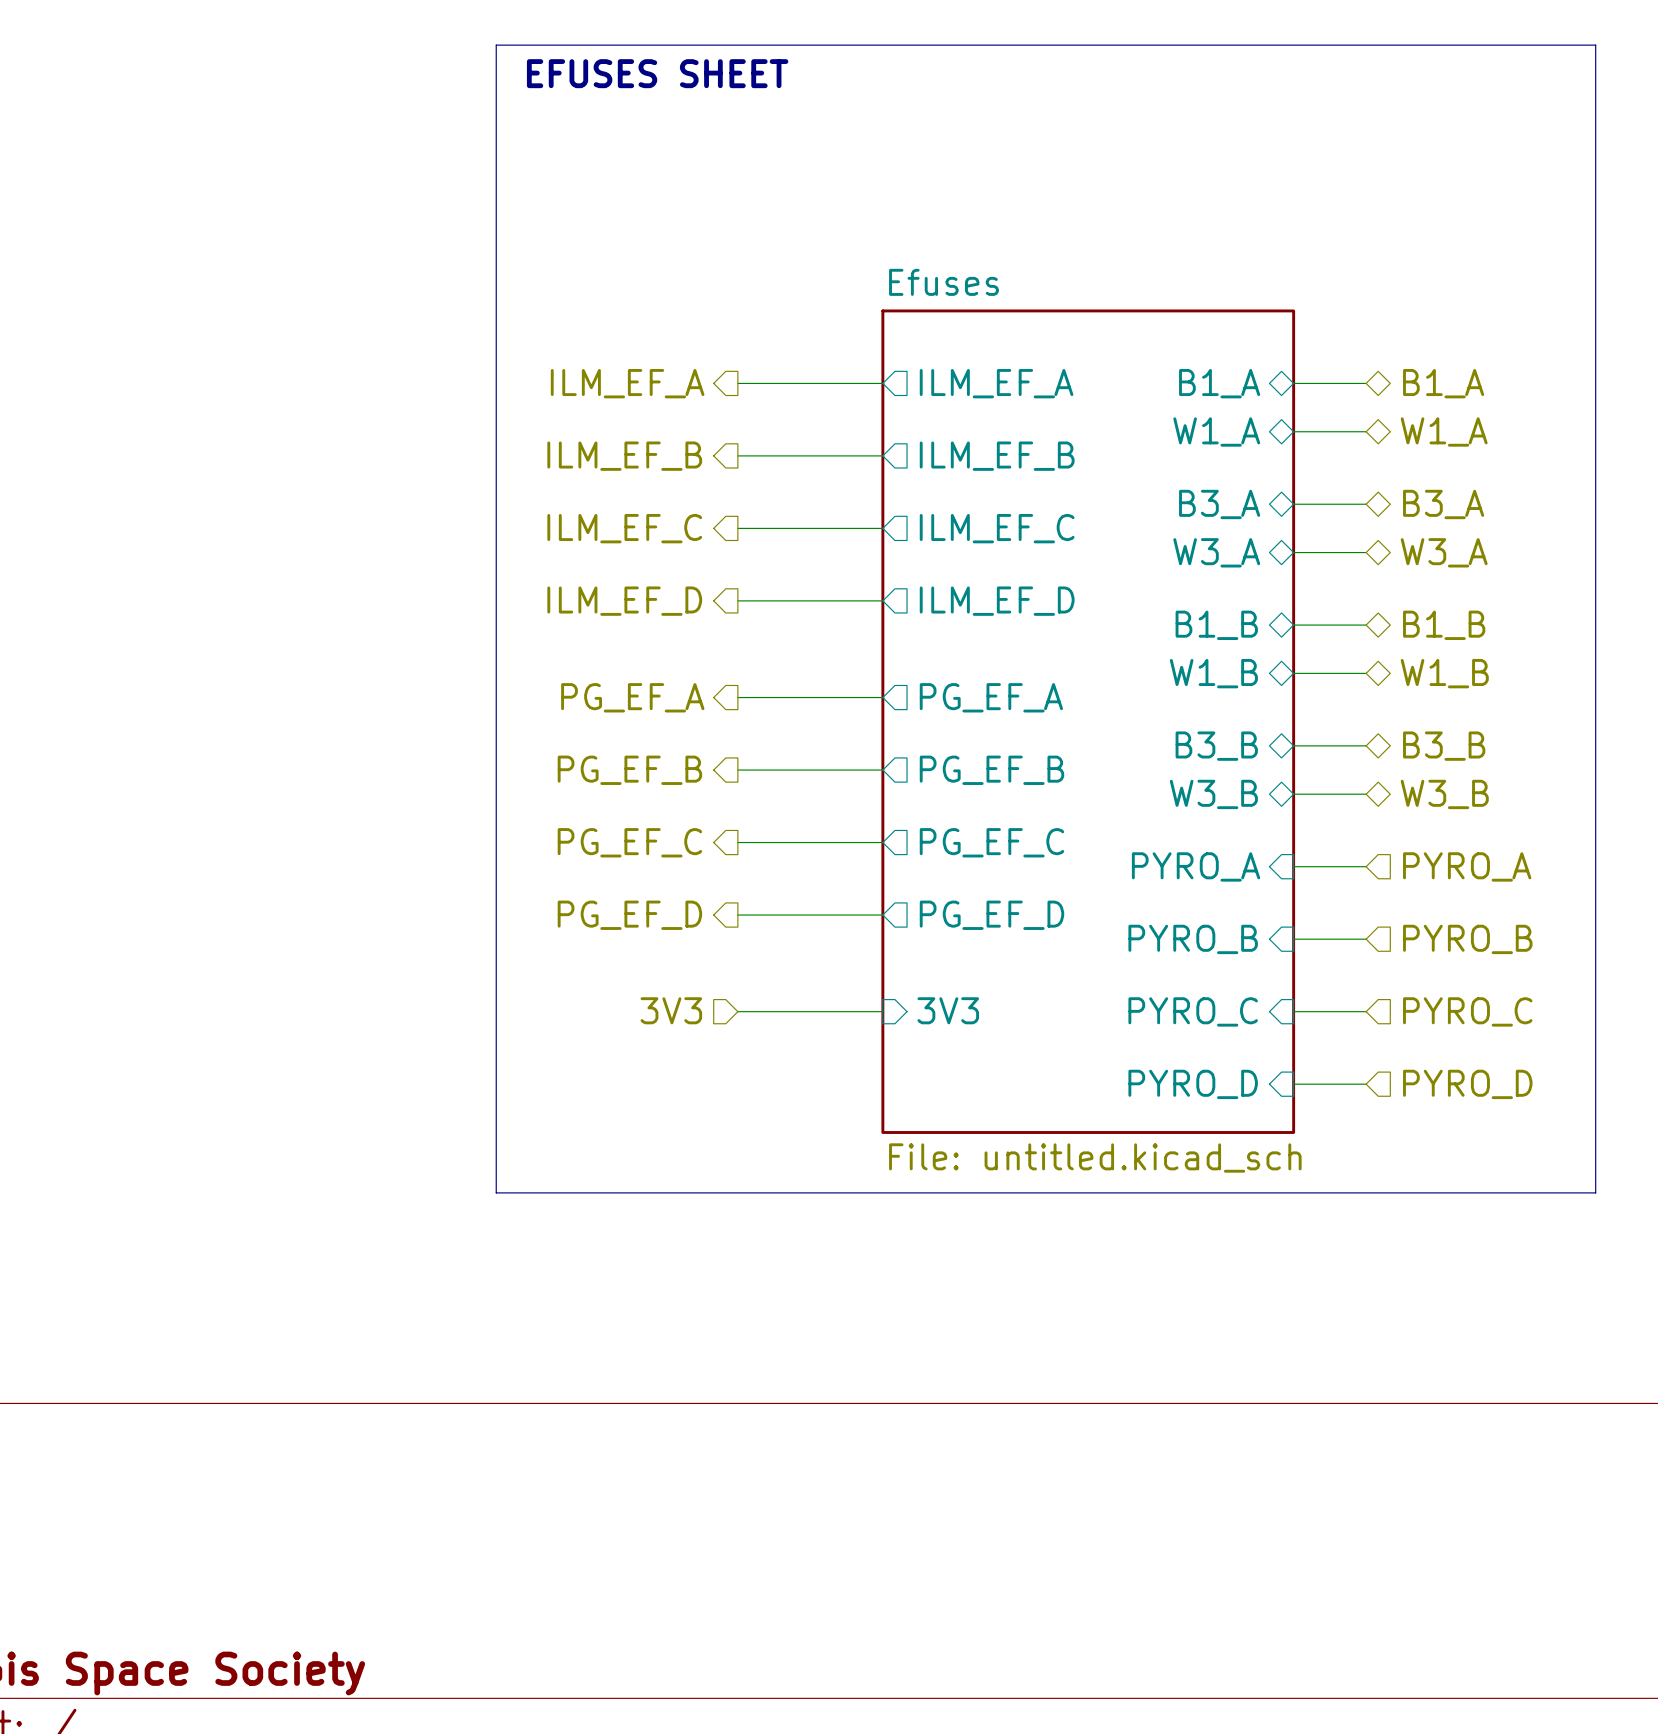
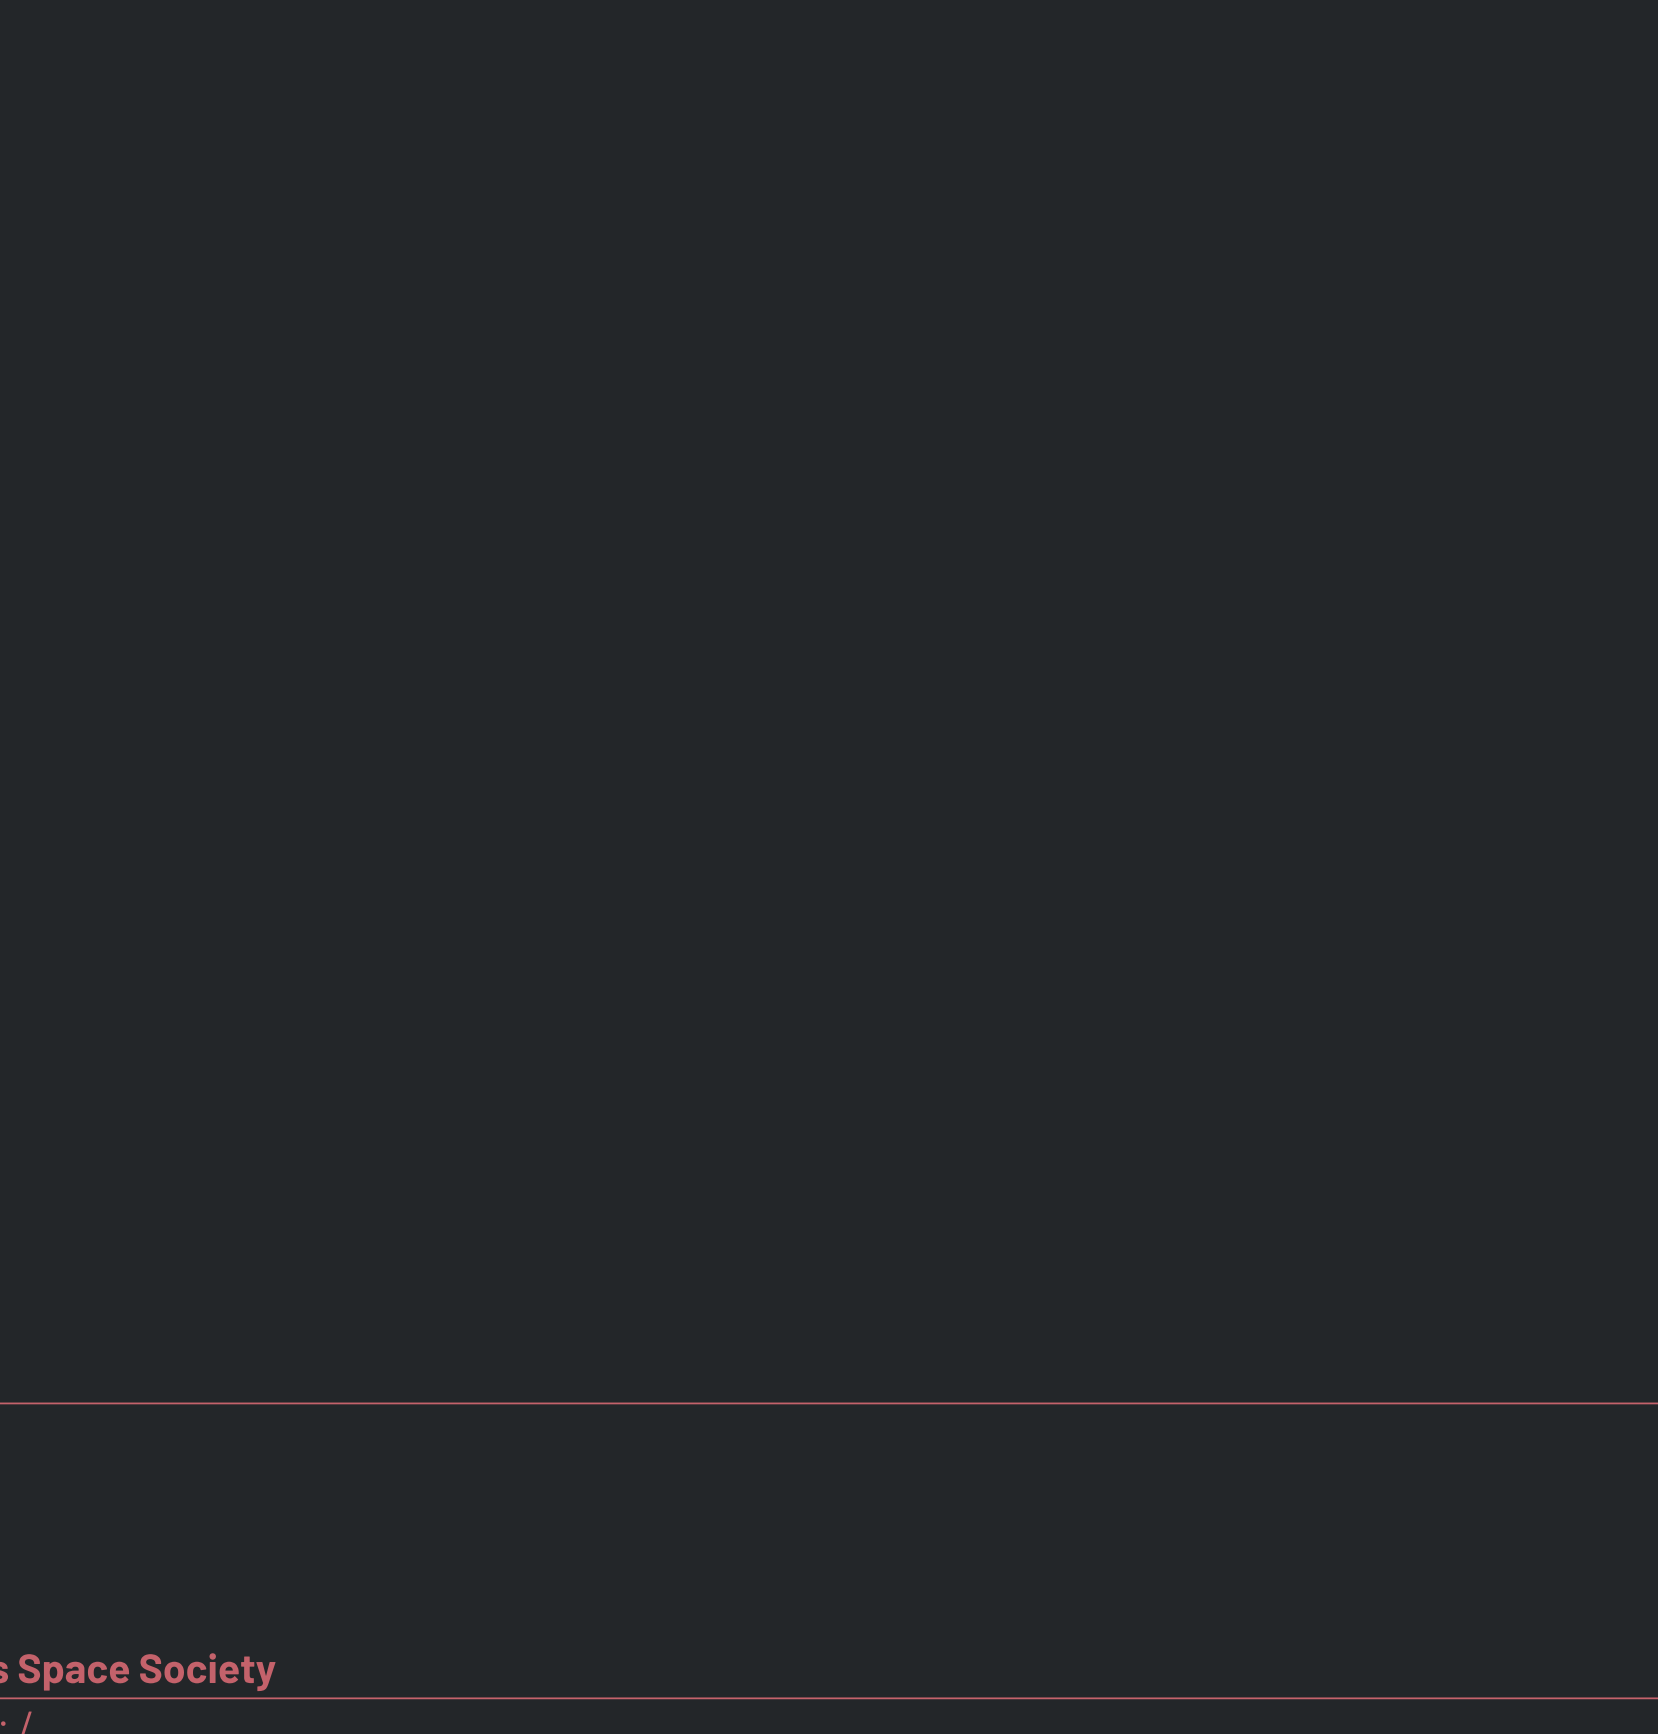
line: (496, 45) (1595, 45) (1595, 1192) (496, 1192) (496, 45) -> none
text: EFUSES SHEET (657, 73) -> none
hierarchical label: ILM_EF_A (627, 383) -> none
wire: (737, 383) (882, 383) -> none
sheet pin: ILM_EF_A (996, 383) -> none
sheet pin: B1_A (1219, 383) -> none
wire: (1293, 383) (1366, 383) -> none
hierarchical label: B1_A (1443, 383) -> none
sheet pin: W1_A (1216, 431) -> none
wire: (1293, 431) (1366, 431) -> none
hierarchical label: W1_A (1444, 431) -> none
wire: (737, 455) (882, 455) -> none
hierarchical label: ILM_EF_B (624, 456) -> none
sheet pin: ILM_EF_B (997, 456) -> none
sheet pin: B3_A (1219, 504) -> none
wire: (1293, 504) (1366, 504) -> none
hierarchical label: B3_A (1443, 504) -> none
hierarchical label: ILM_EF_C (624, 528) -> none
wire: (737, 528) (882, 528) -> none
sheet pin: ILM_EF_C (997, 528) -> none
sheet pin: W3_A (1216, 552) -> none
wire: (1293, 552) (1366, 552) -> none
hierarchical label: W3_A (1444, 552) -> none
wire: (737, 600) (882, 600) -> none
hierarchical label: ILM_EF_D (624, 601) -> none
sheet pin: ILM_EF_D (997, 601) -> none
sheet pin: B1_B (1216, 625) -> none
wire: (1293, 625) (1366, 625) -> none
hierarchical label: B1_B (1444, 625) -> none
sheet pin: W1_B (1213, 673) -> none
wire: (1293, 673) (1366, 673) -> none
hierarchical label: W1_B (1444, 673) -> none
hierarchical label: PG_EF_A (632, 697) -> none
wire: (737, 697) (882, 697) -> none
sheet pin: PG_EF_A (991, 697) -> none
sheet Efuses: File: untitled.kicad_sch (1088, 721) -> none
wire: (1293, 745) (1366, 745) -> none
sheet pin: B3_B (1216, 746) -> none
hierarchical label: B3_B (1444, 746) -> none
hierarchical label: PG_EF_B (629, 770) -> none
wire: (737, 770) (882, 770) -> none
sheet pin: PG_EF_B (991, 770) -> none
sheet pin: W3_B (1213, 794) -> none
wire: (1293, 794) (1366, 794) -> none
hierarchical label: W3_B (1444, 794) -> none
hierarchical label: PG_EF_C (629, 842) -> none
wire: (737, 842) (882, 842) -> none
sheet pin: PG_EF_C (991, 842) -> none
sheet pin: PYRO_A (1196, 866) -> none
wire: (1293, 866) (1366, 866) -> none
hierarchical label: PYRO_A (1467, 866) -> none
hierarchical label: PG_EF_D (629, 915) -> none
wire: (737, 915) (882, 915) -> none
sheet pin: PG_EF_D (991, 915) -> none
sheet pin: PYRO_B (1193, 939) -> none
wire: (1293, 939) (1366, 939) -> none
hierarchical label: PYRO_B (1467, 939) -> none
hierarchical label: 3V3 (671, 1010) -> none
sheet pin: 3V3 (948, 1010) -> none
wire: (737, 1011) (882, 1011) -> none
sheet pin: PYRO_C (1193, 1011) -> none
wire: (1293, 1011) (1366, 1011) -> none
hierarchical label: PYRO_C (1467, 1011) -> none
sheet pin: PYRO_D (1193, 1084) -> none
wire: (1293, 1084) (1366, 1084) -> none
hierarchical label: PYRO_D (1467, 1084) -> none

